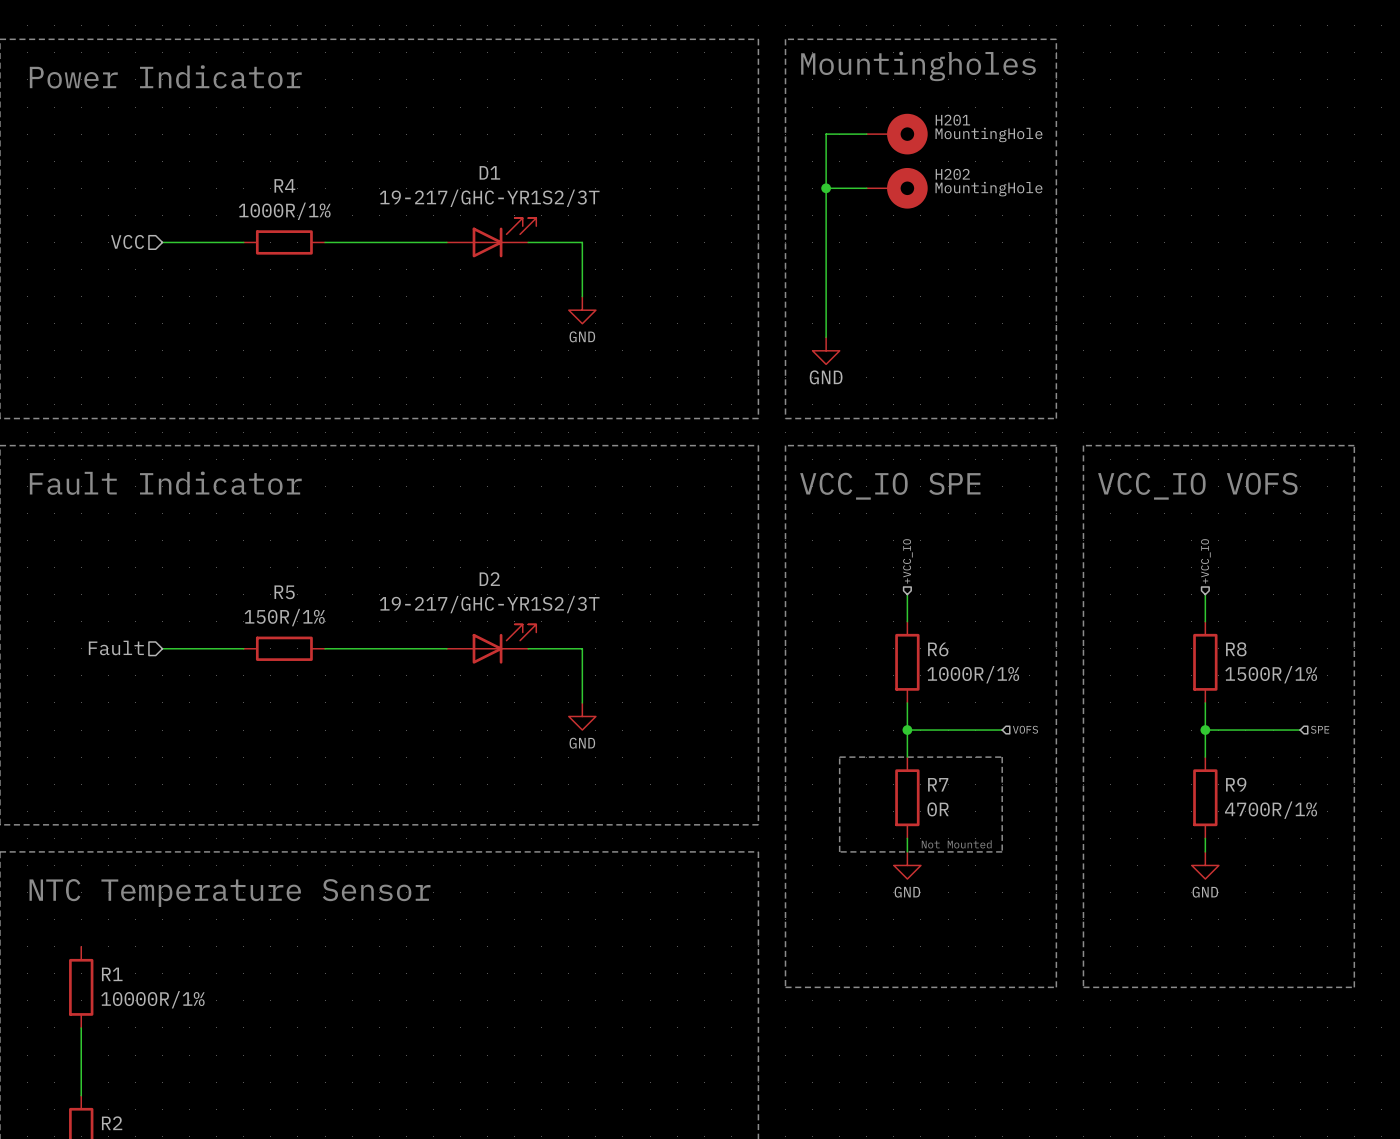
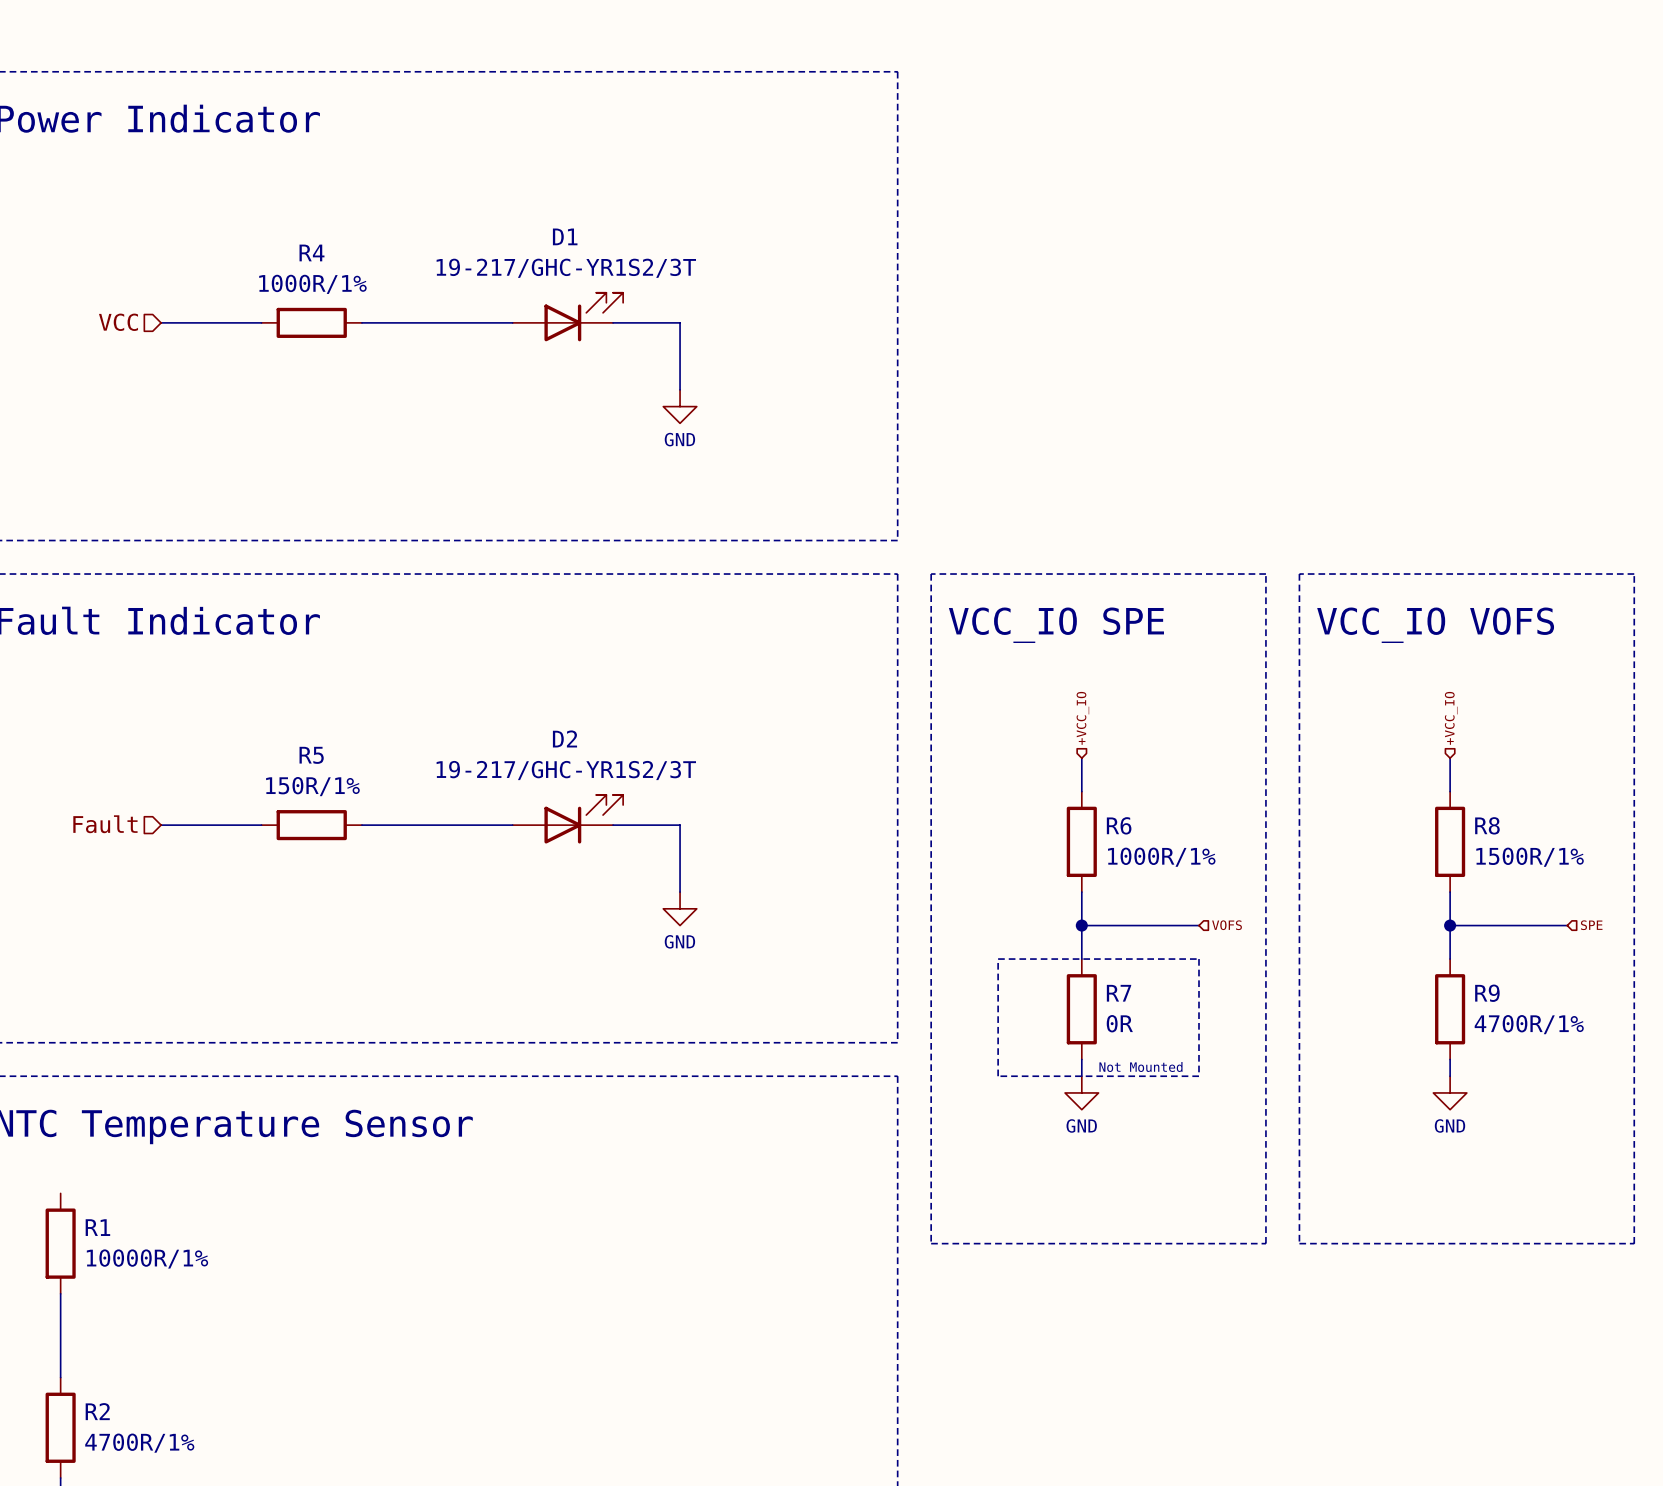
line: (785, 39) (1056, 39) (1056, 418) (785, 418) (785, 39) -> none
text: Mountingholes (918, 66) -> none
wire: (866, 134) (826, 134) (826, 337) -> none
H201: MountingHole (897, 134) -> none
wire: (826, 188) (866, 188) -> none
junction: (826, 188) -> none
H202: MountingHole (897, 188) -> none
power symbol: GND (826, 350) -> none

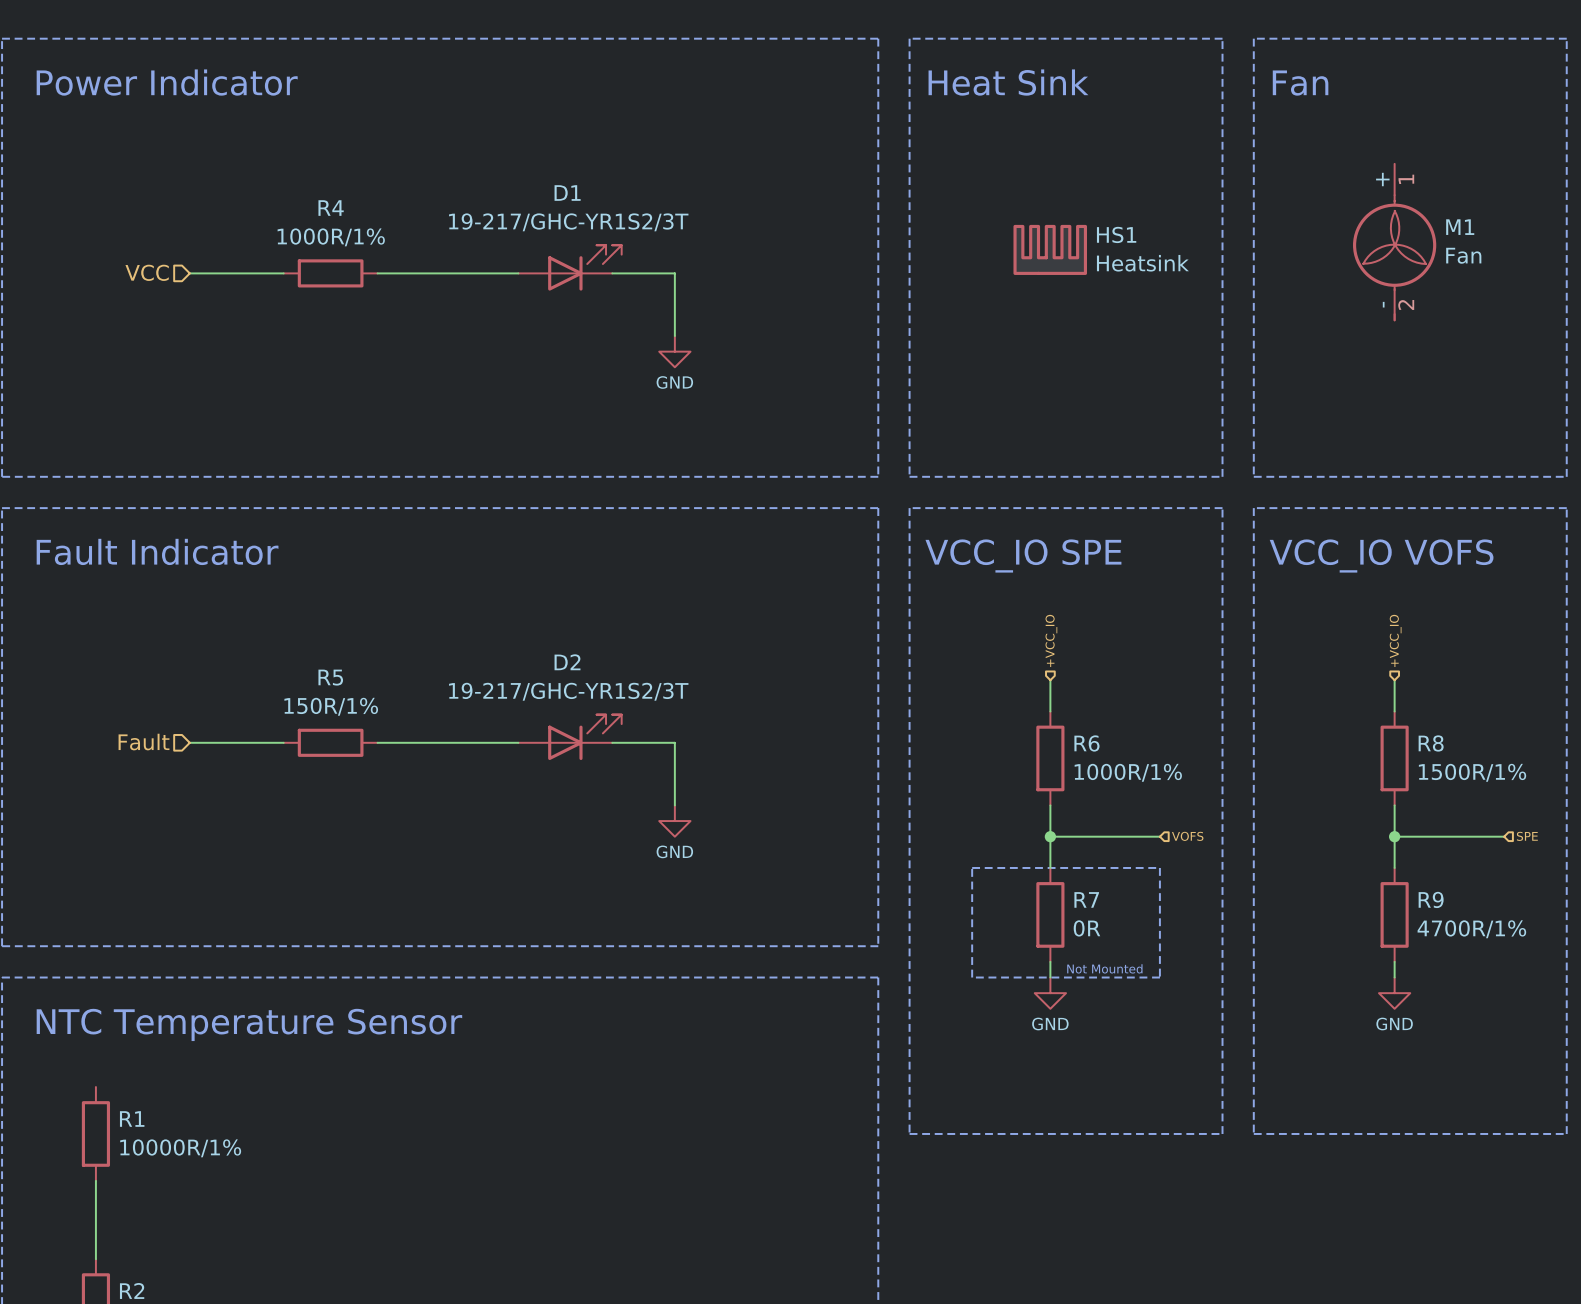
line: none -> (909, 38) (909, 476) (1222, 476) (1222, 38) (909, 38)
line: none -> (1253, 38) (1566, 38) (1566, 476) (1253, 476) (1253, 38)
text: none -> Heat Sink (1008, 82)
text: none -> Fan (1300, 83)
M1: none -> Fan (1394, 242)
HS1: none -> Heatsink (1050, 249)

